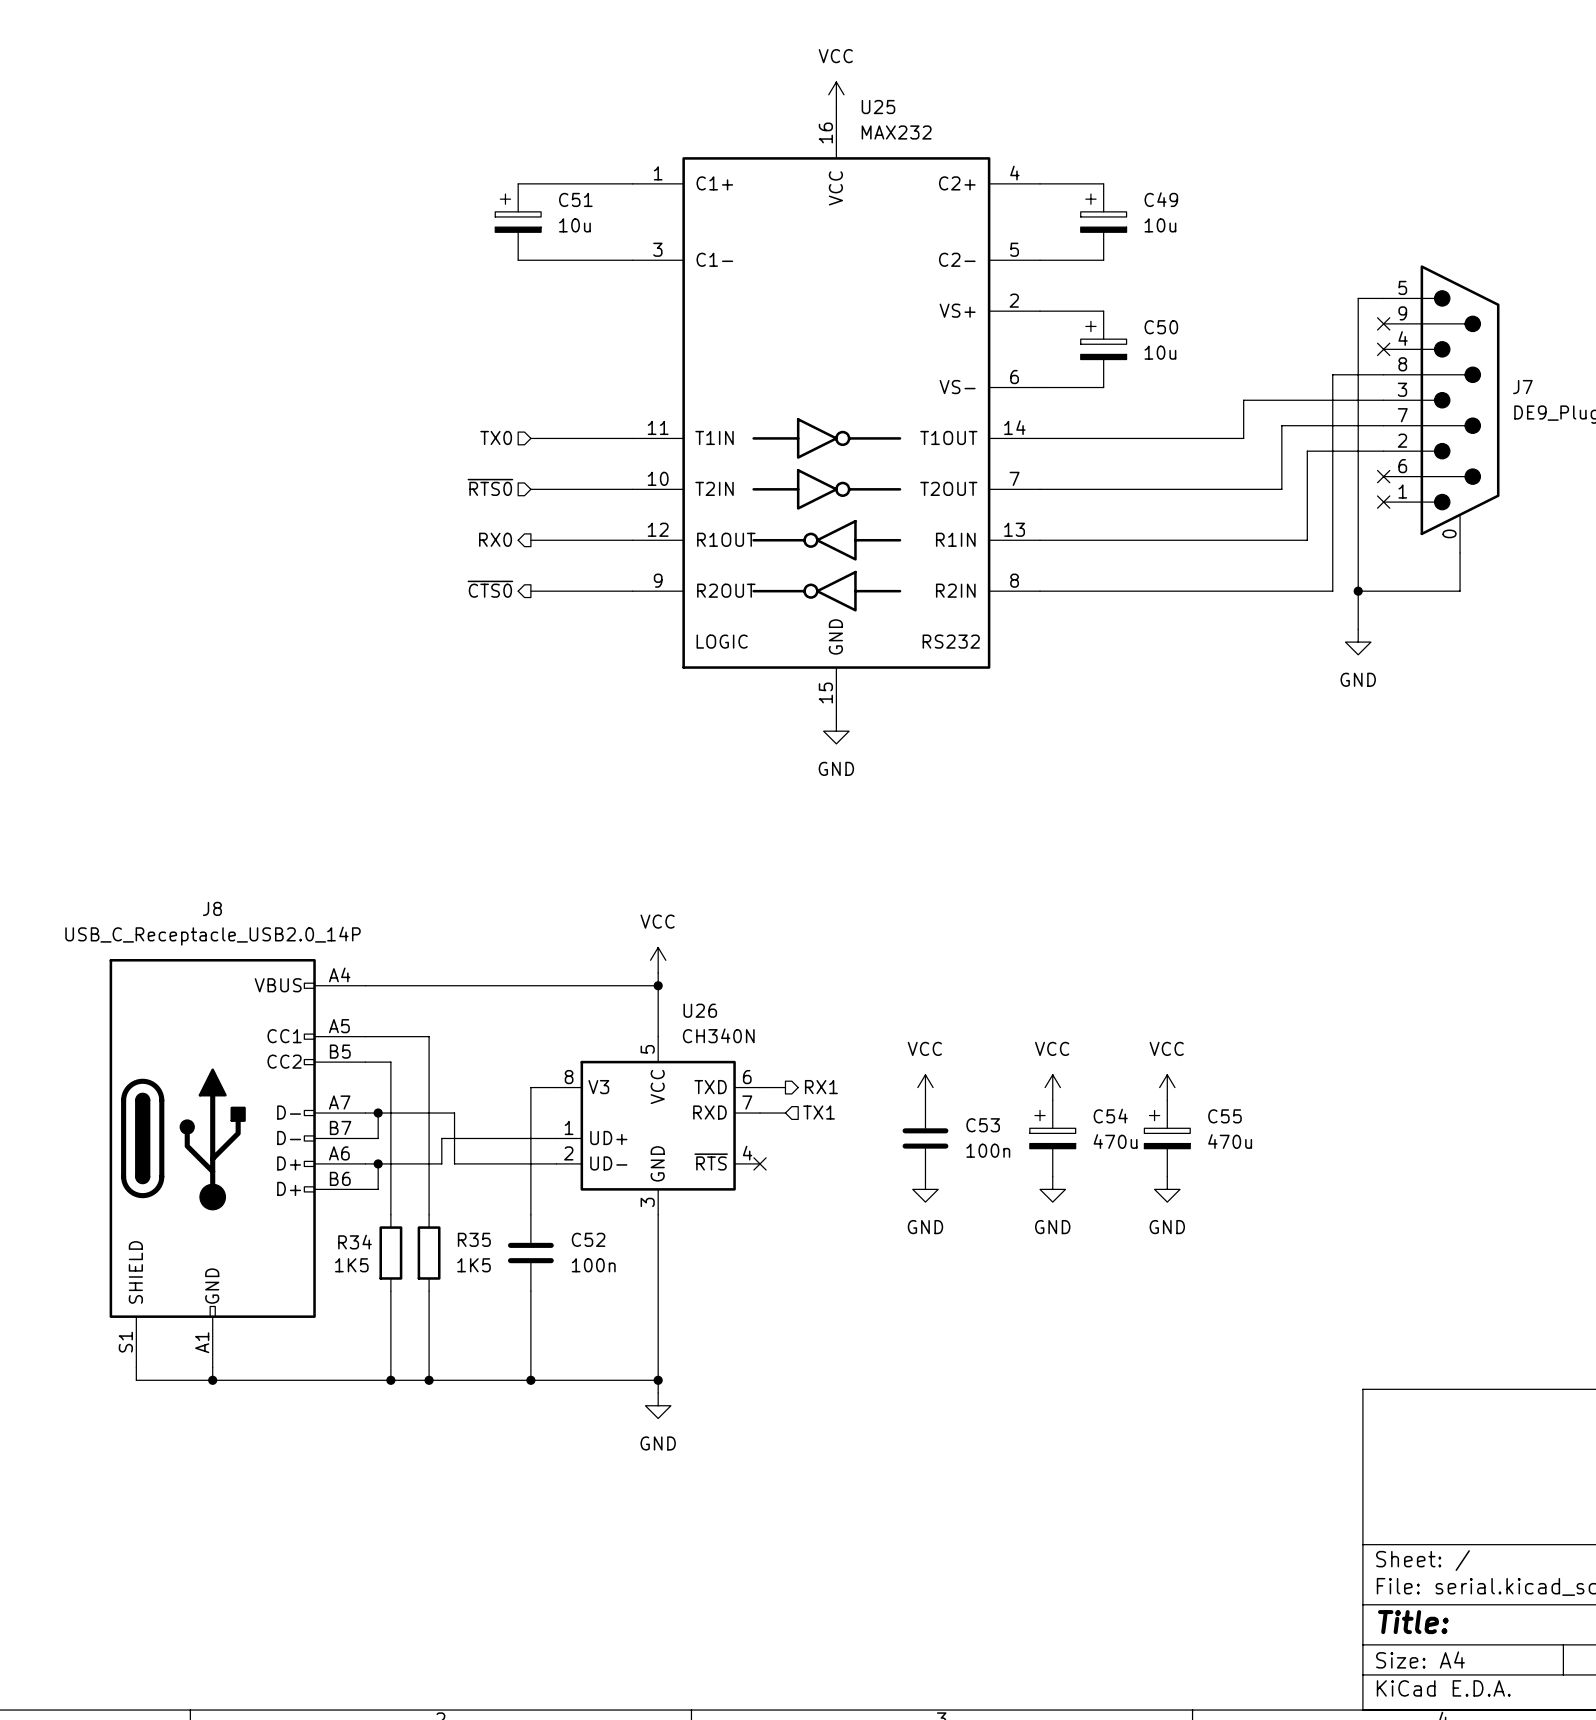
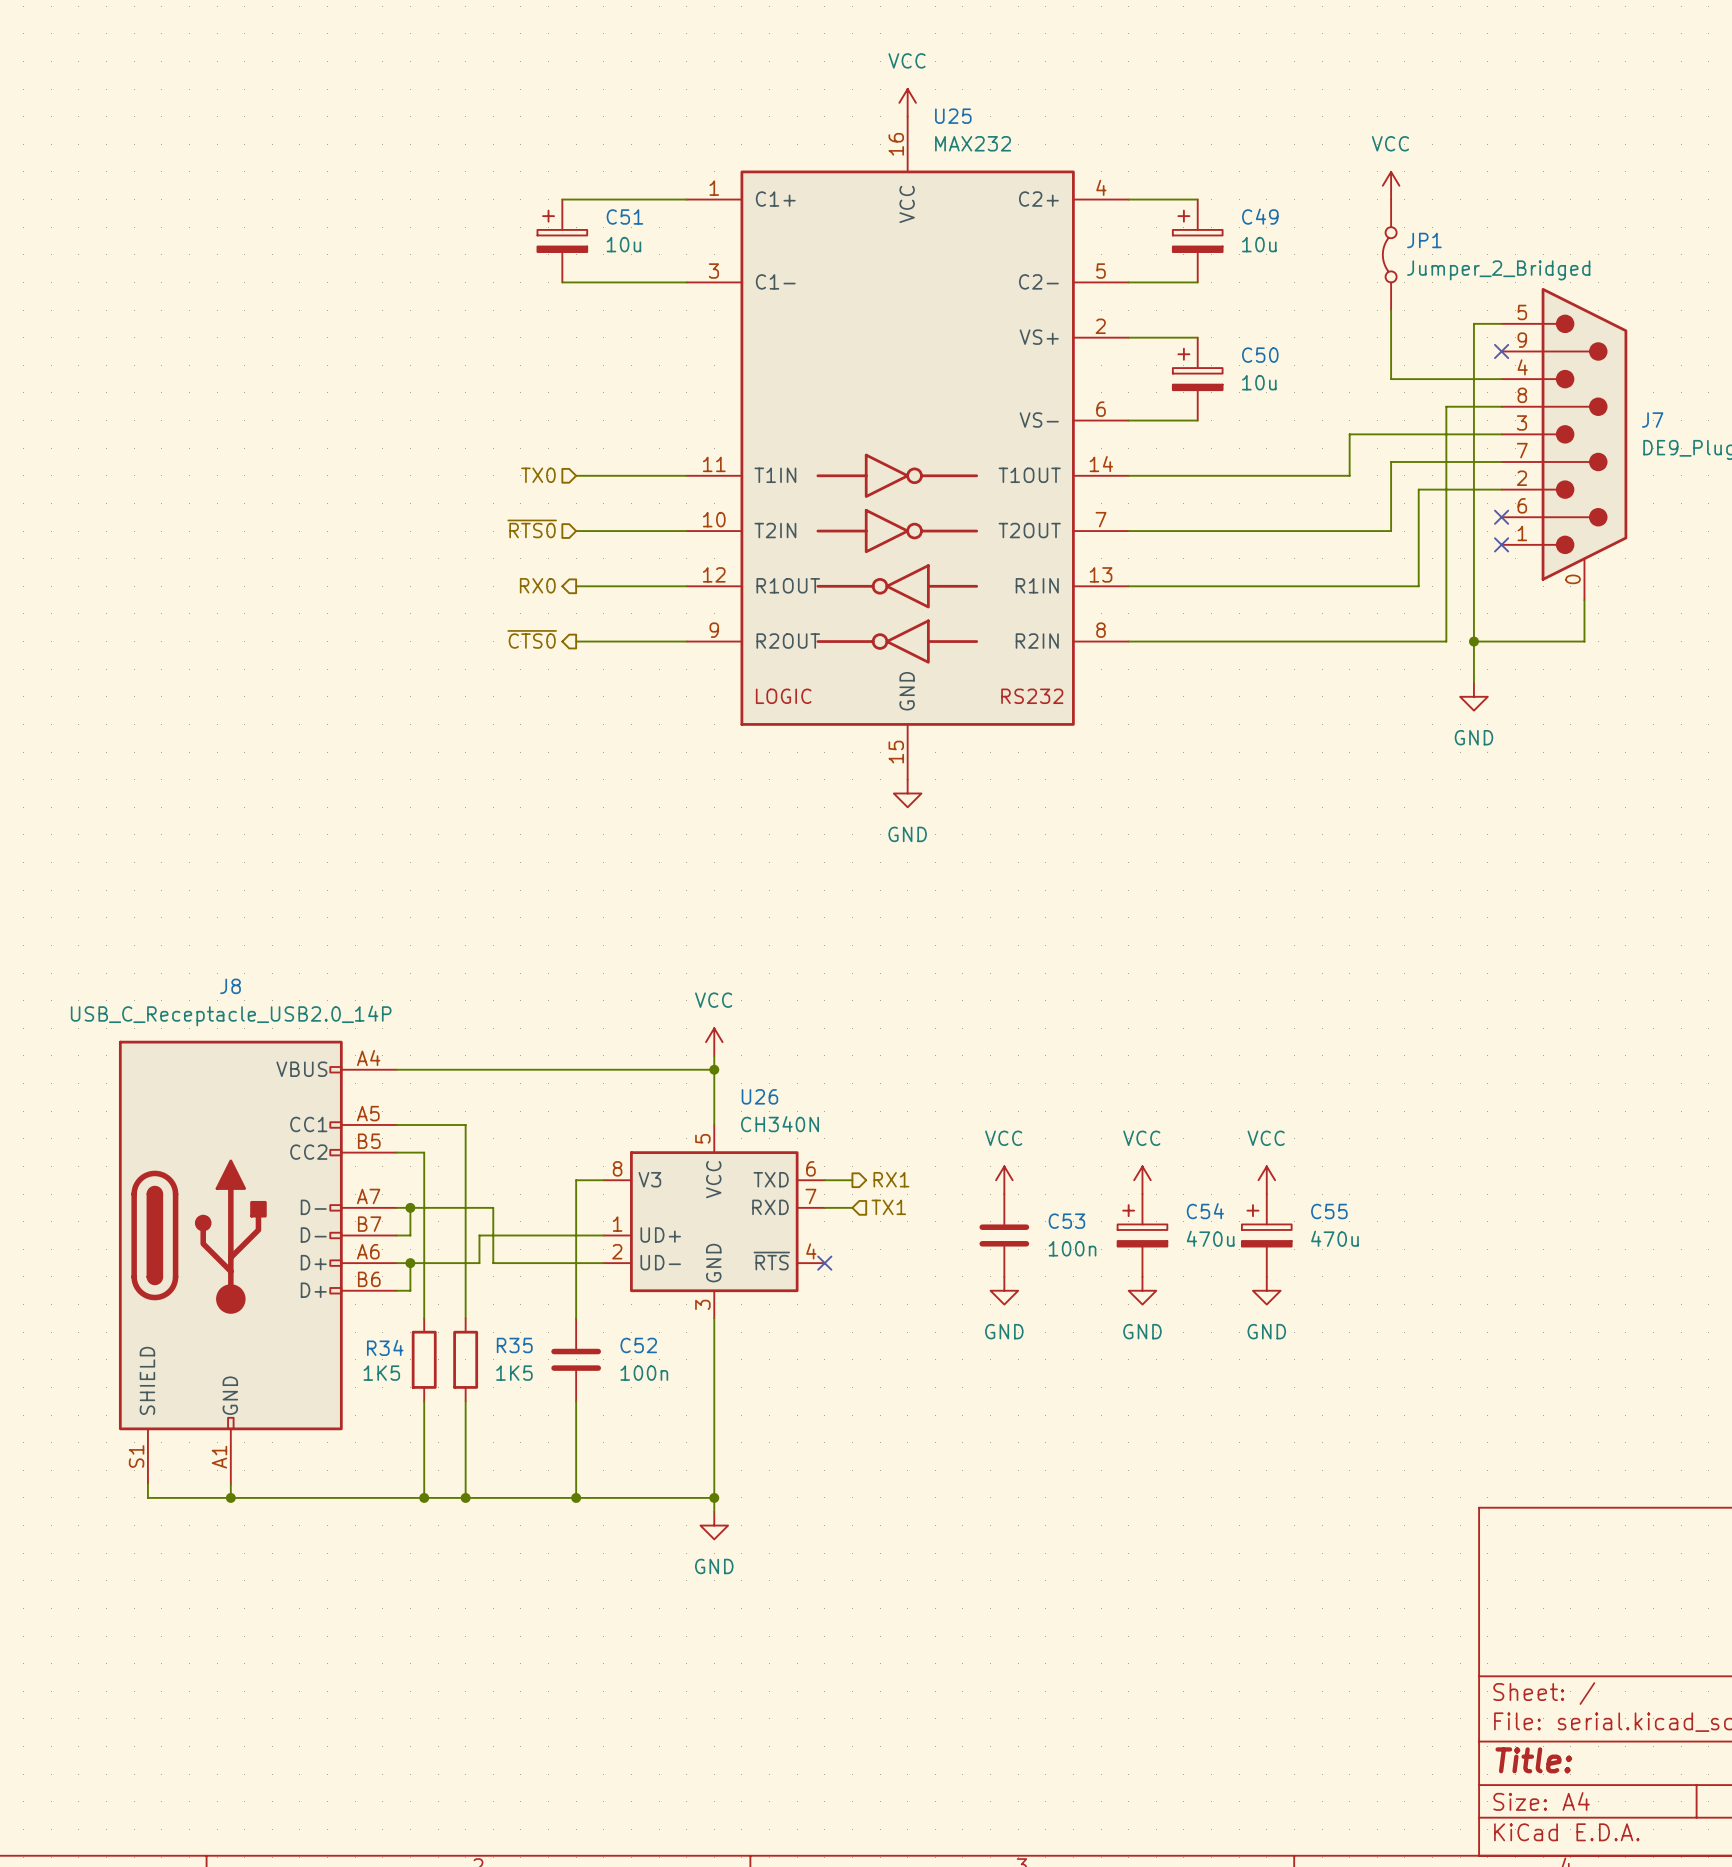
power symbol: none -> VCC (1391, 185)
JP1: none -> Jumper_2_Bridged (1389, 254)
wire: none -> (1391, 310) (1391, 379) (1501, 379)
no-connect mark: (1383, 349) -> none

